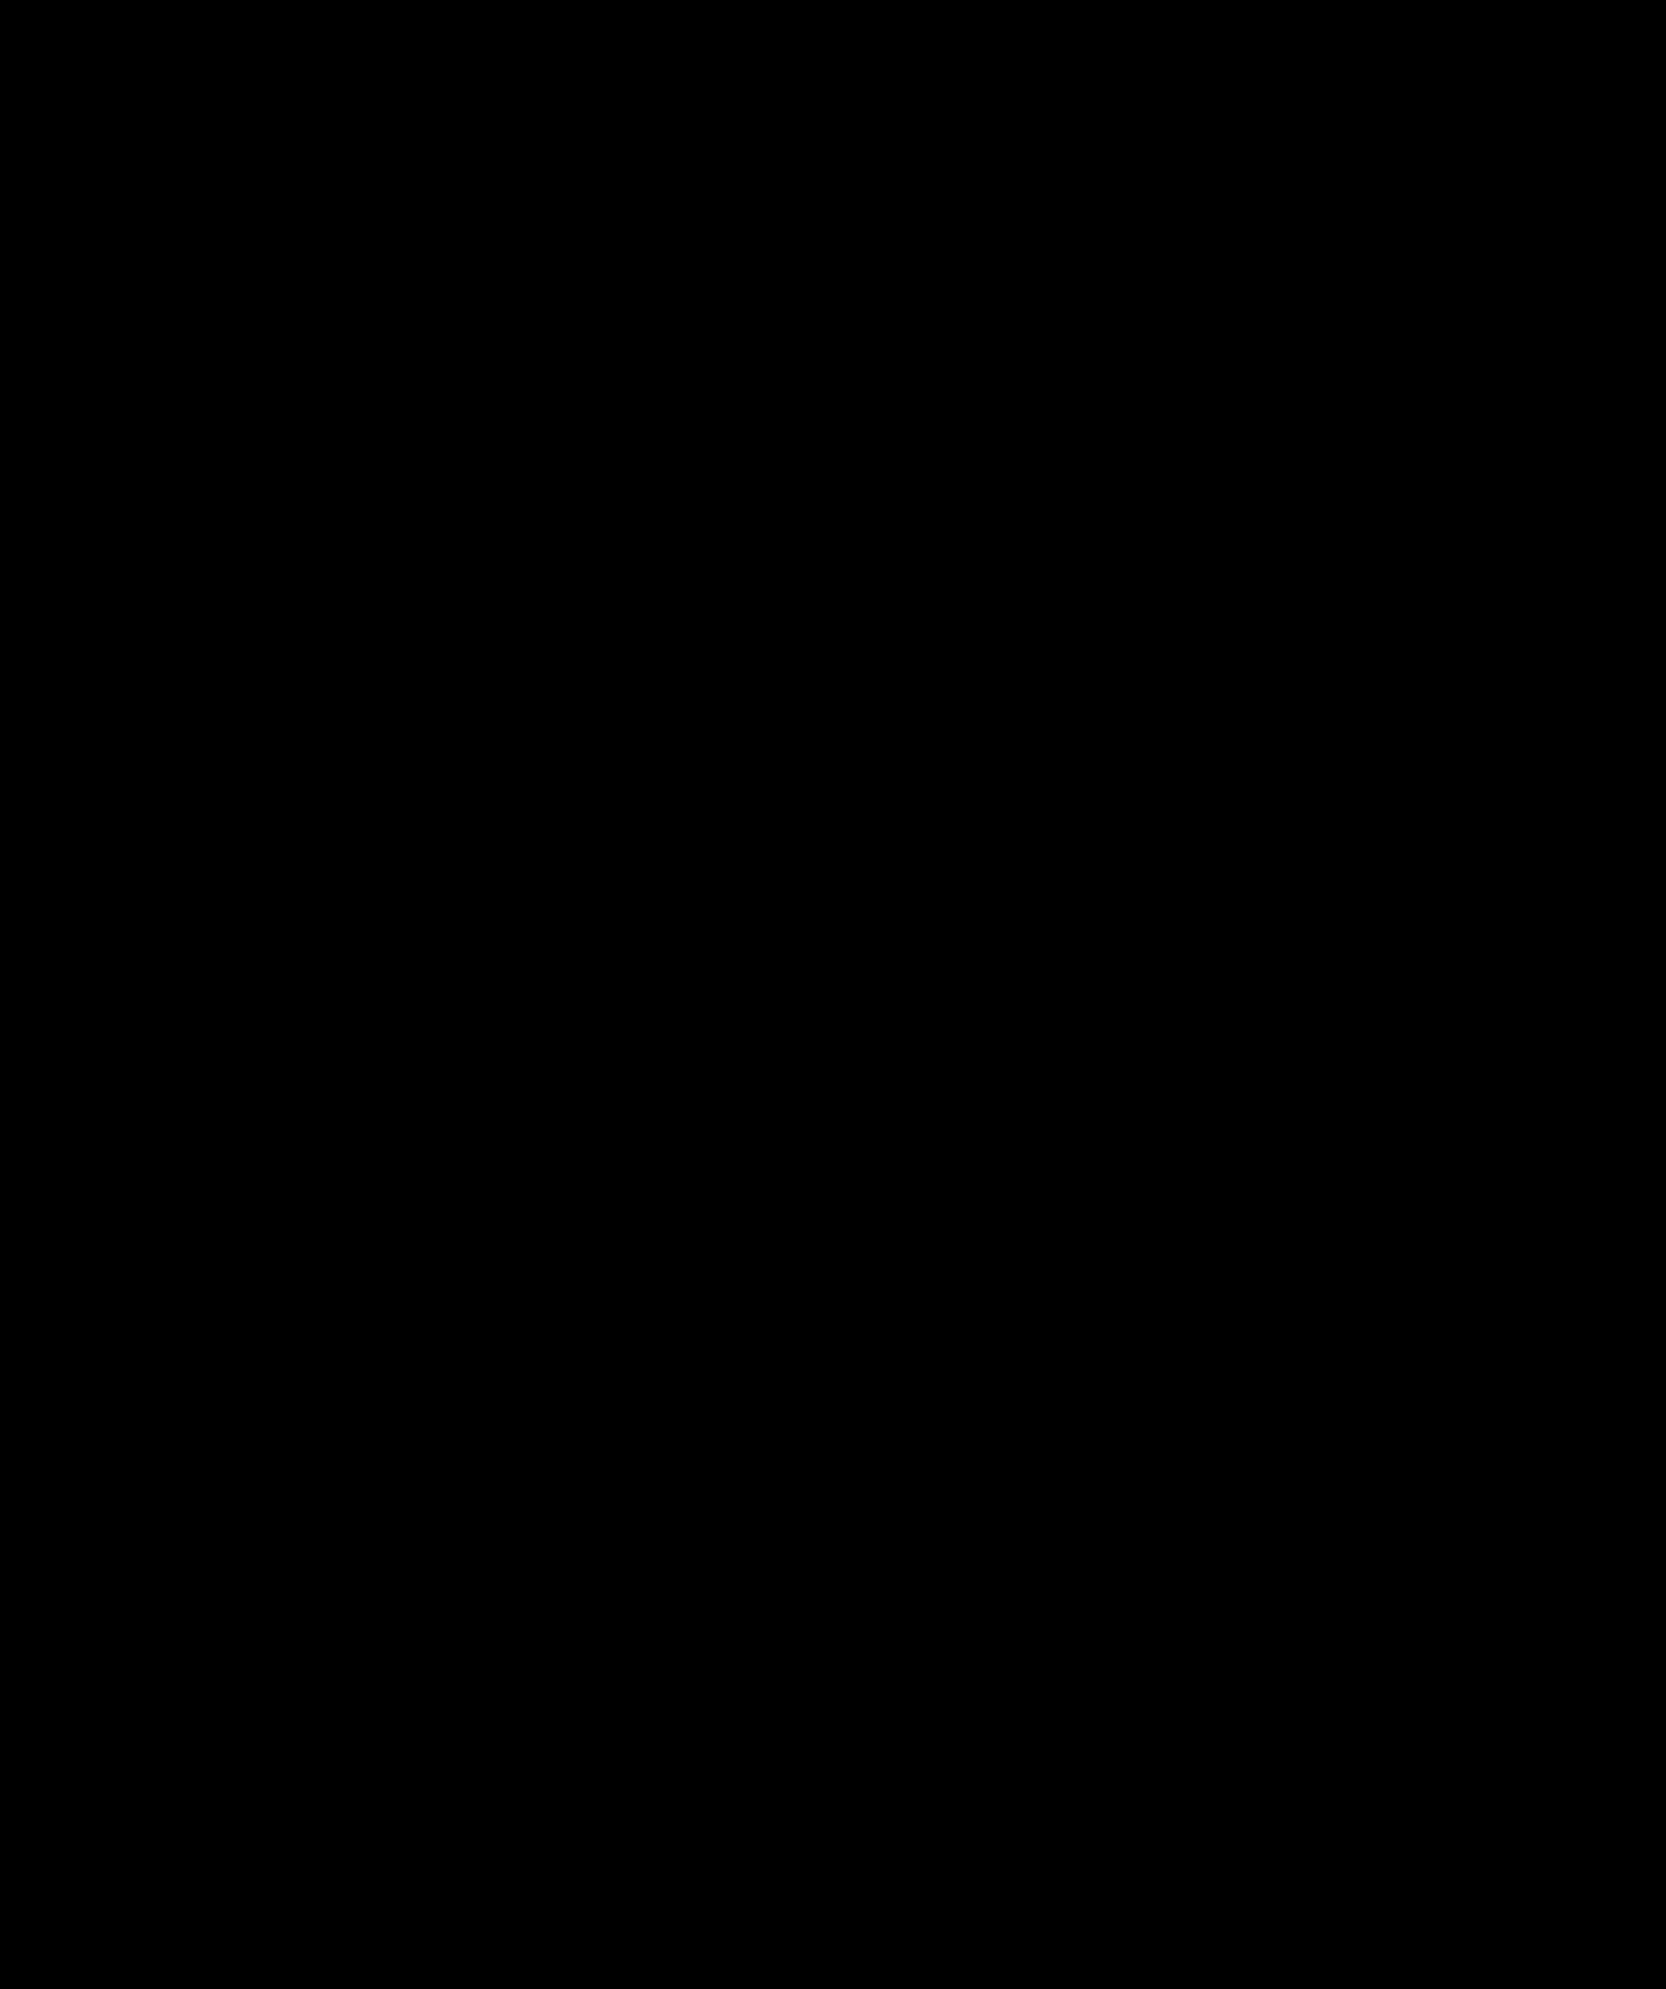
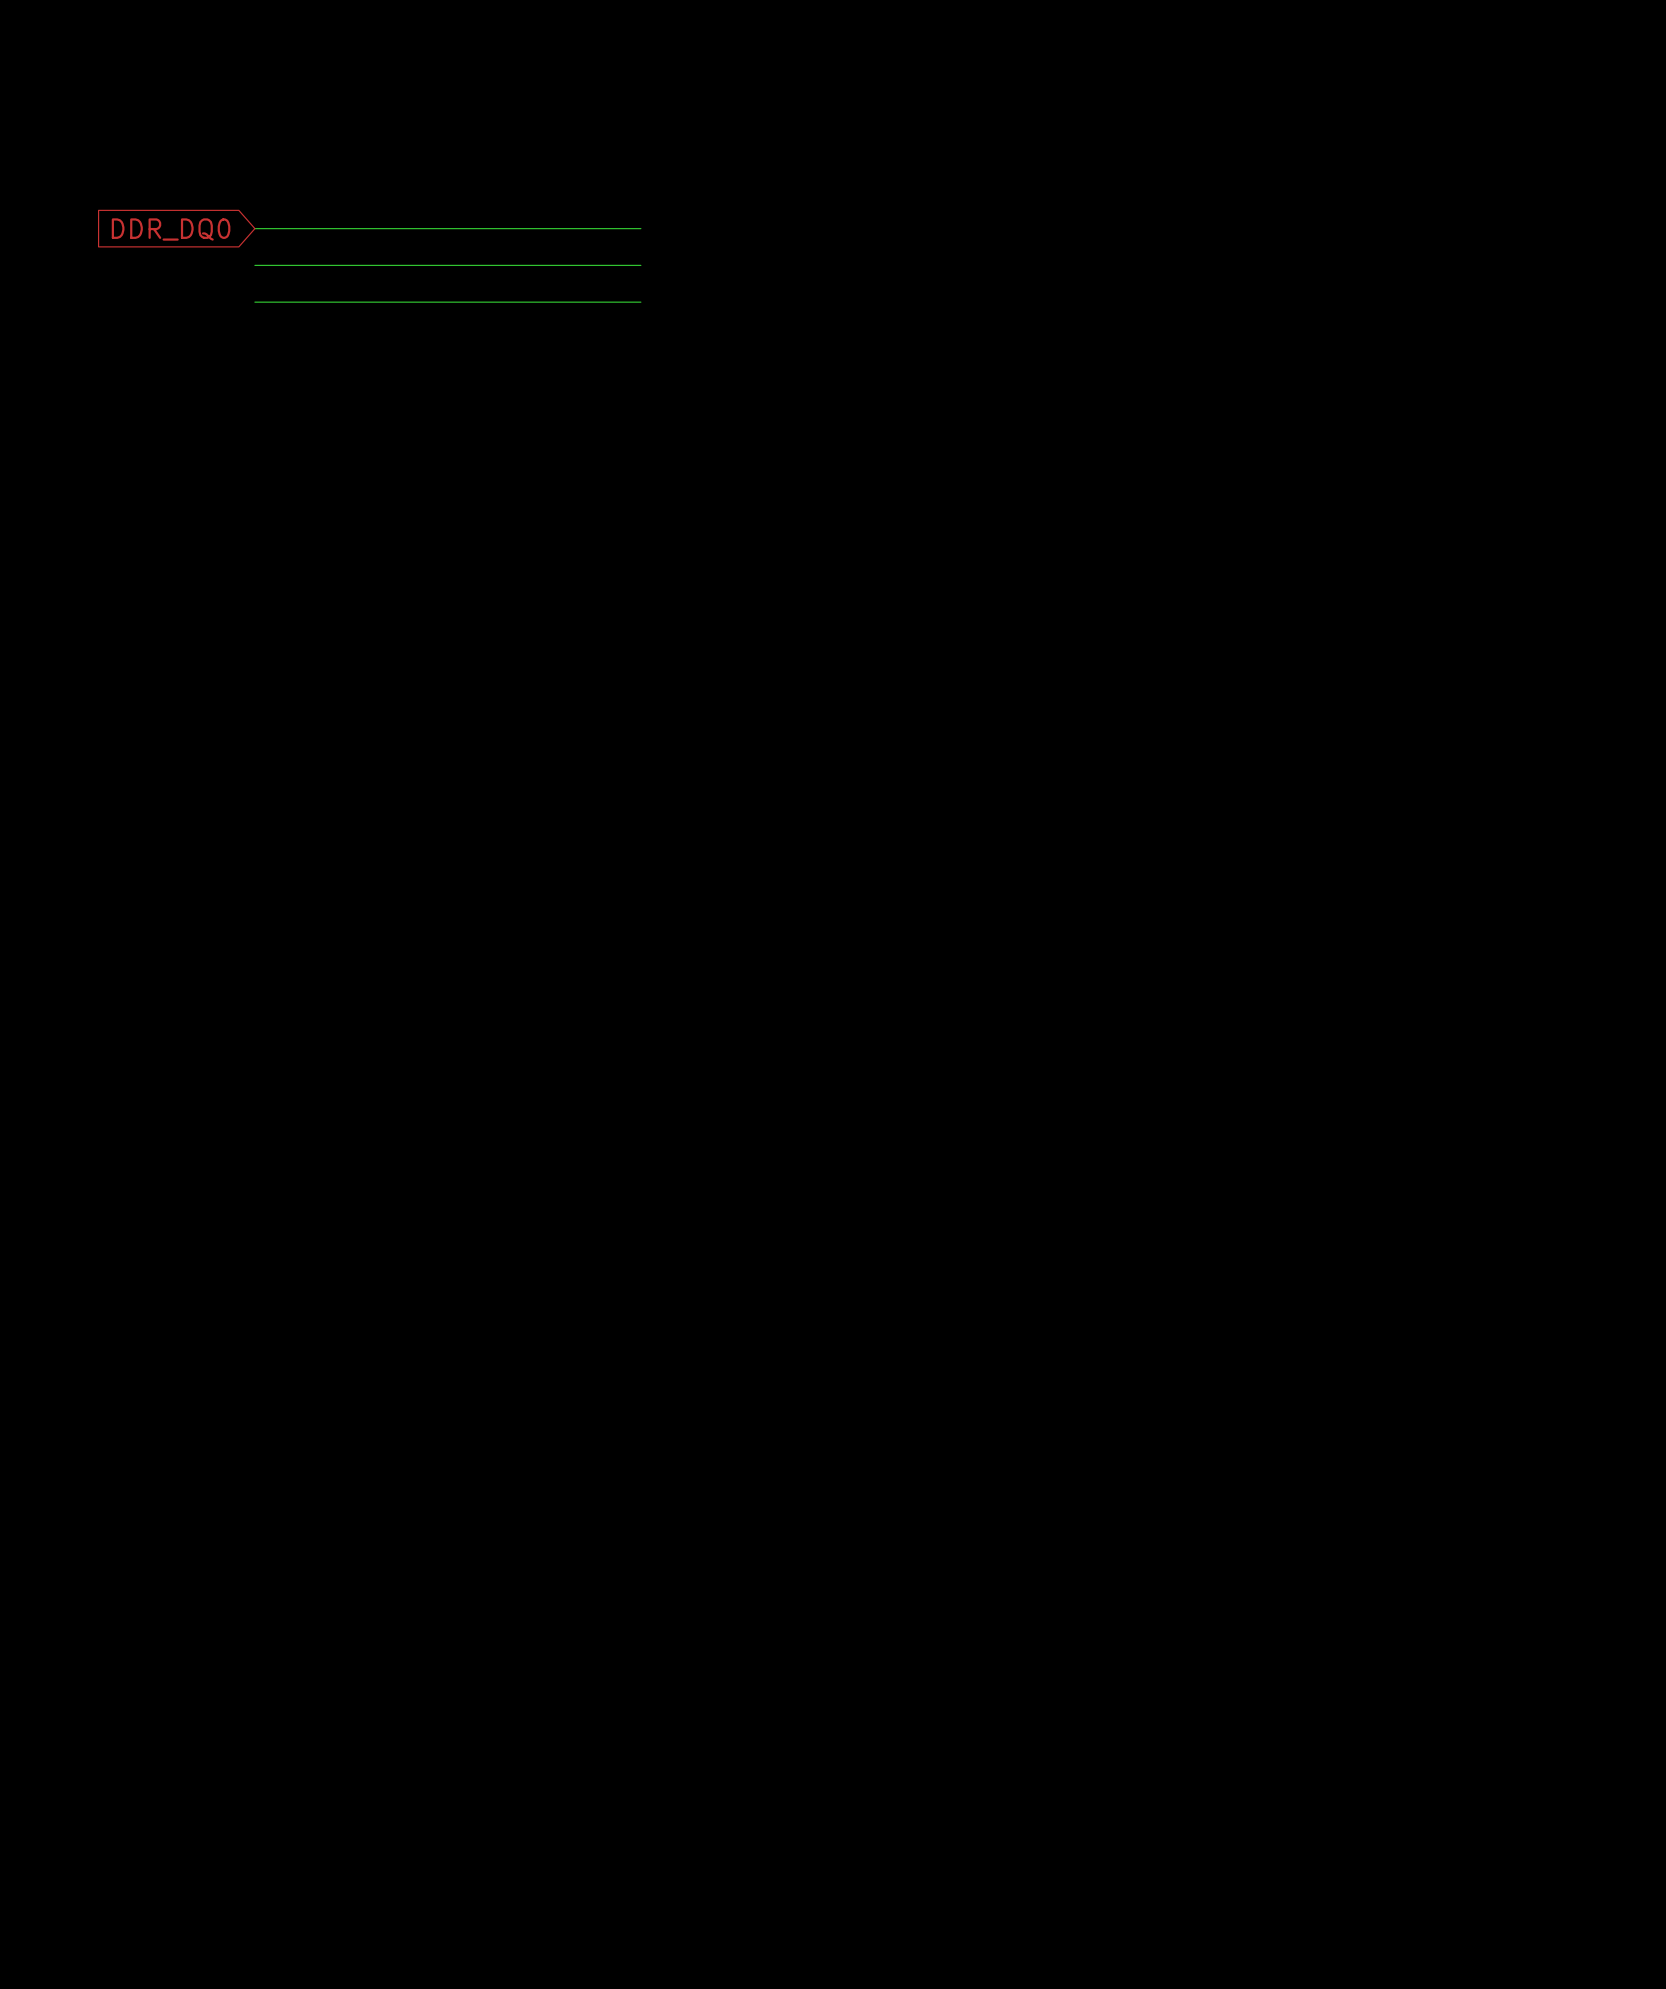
wire: none -> (254, 228) (640, 228)
global label: none -> DDR_DQ0 (171, 229)
wire: none -> (254, 265) (640, 265)
wire: none -> (254, 302) (640, 302)

